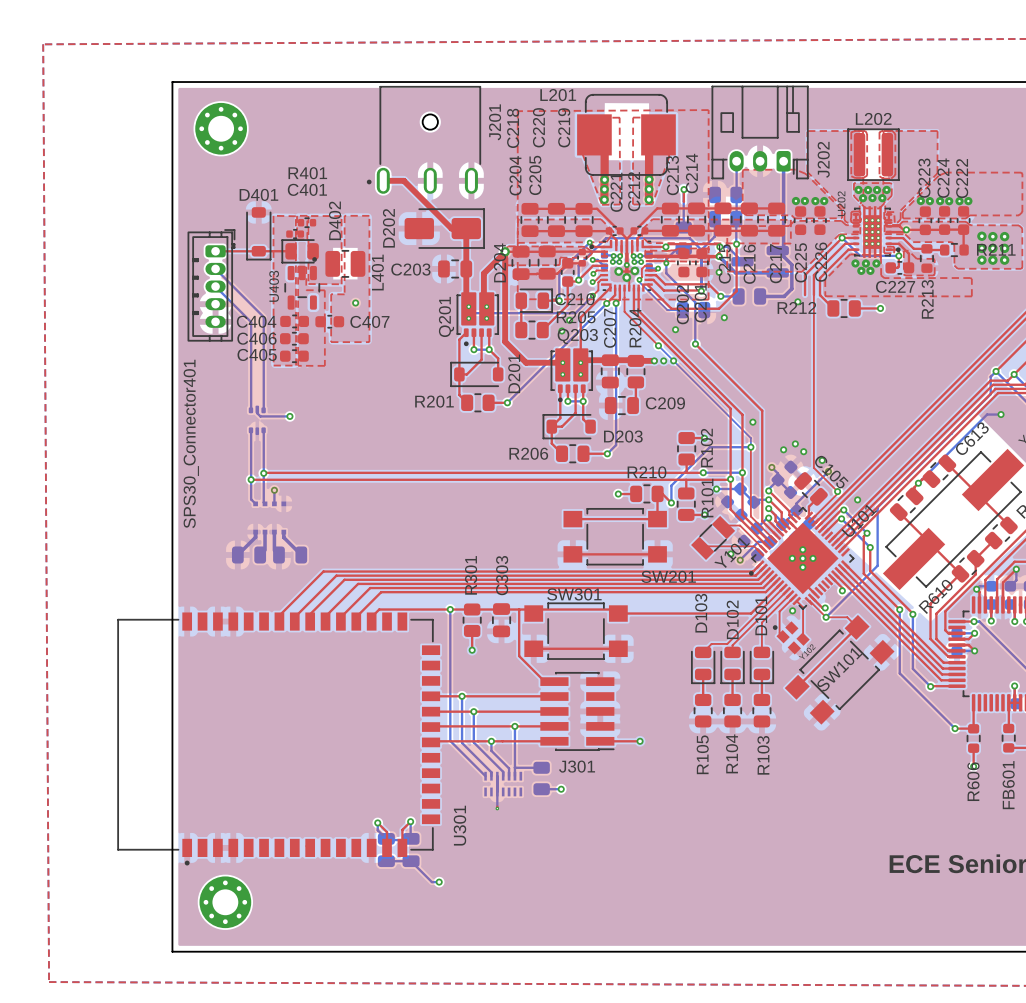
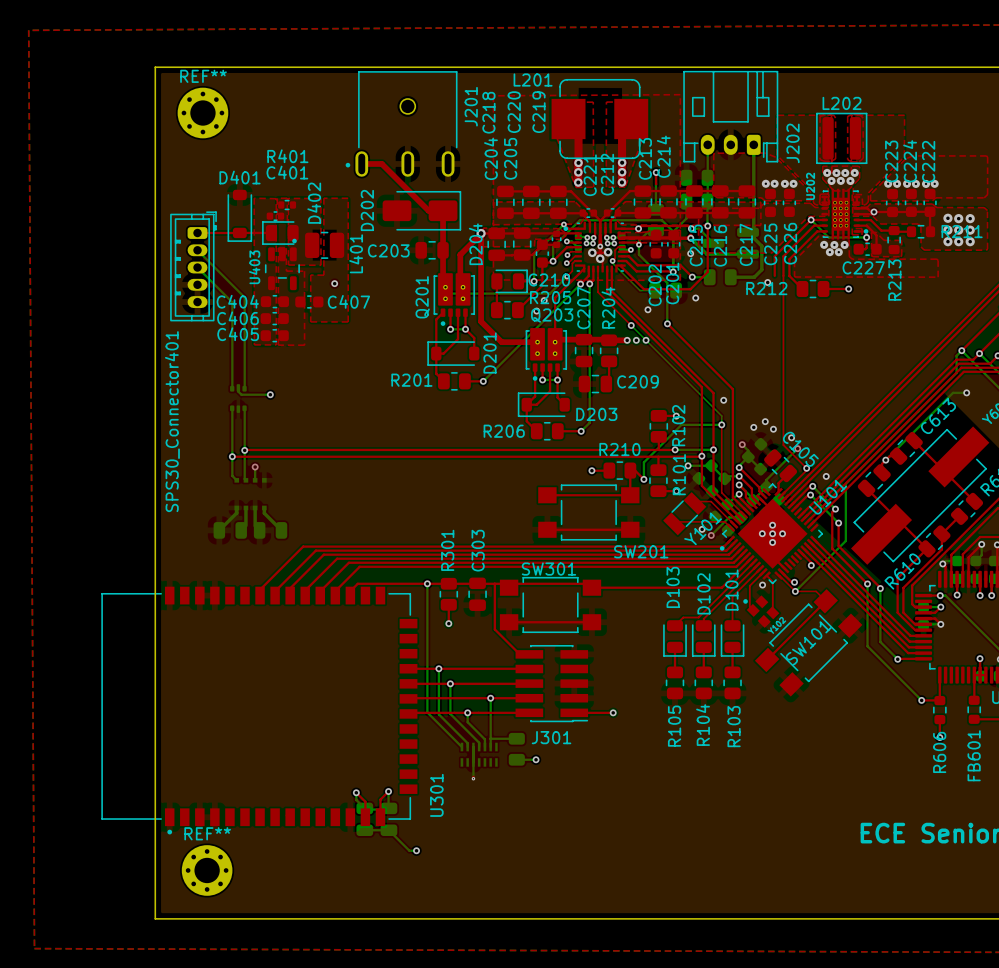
REF** name: none -> REF** (203, 76)
REF** name: none -> REF** (207, 833)

